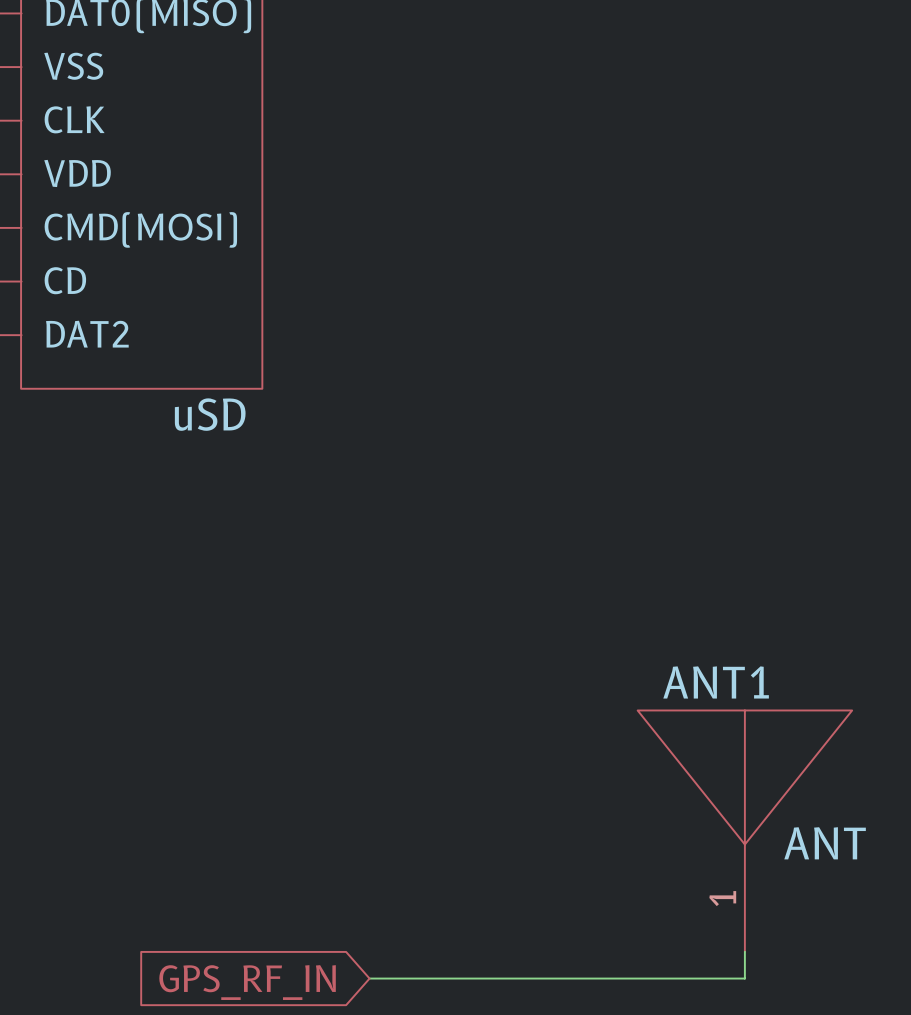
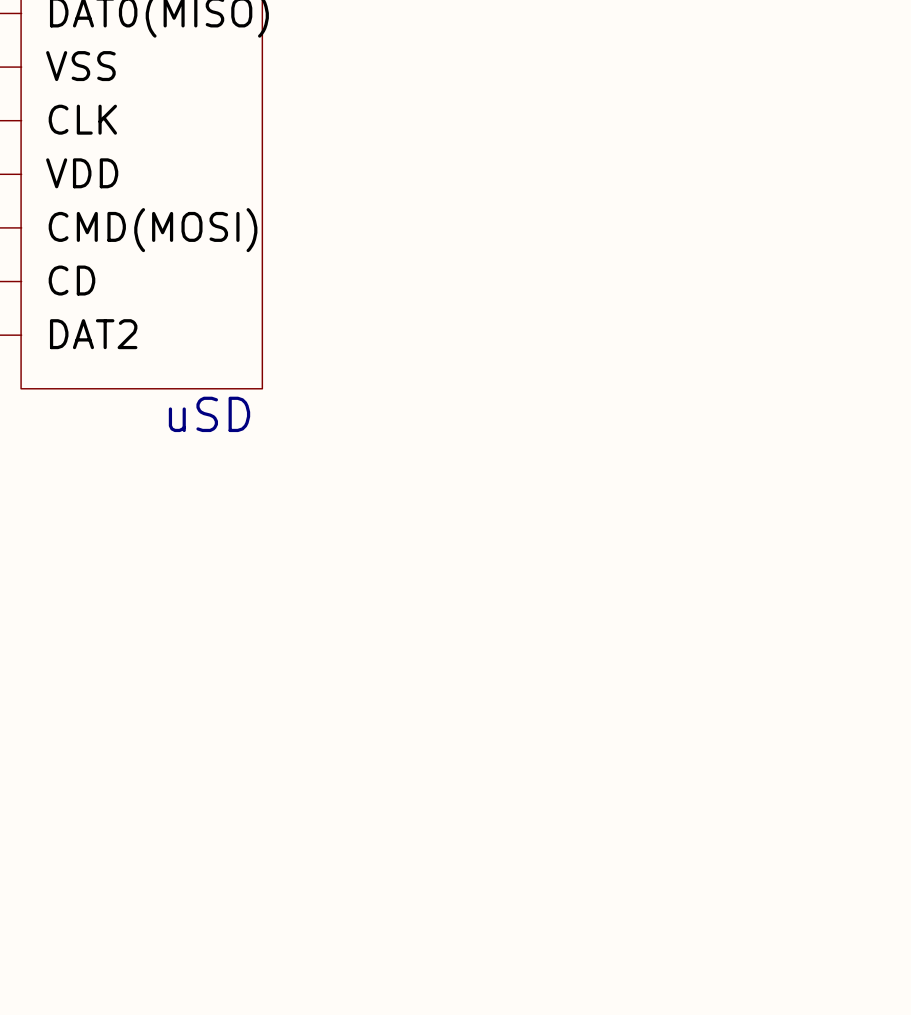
ANT1: ANT (744, 831) -> none
wire: (744, 951) (744, 978) (369, 978) -> none
global label: GPS_RF_IN (247, 982) -> none

